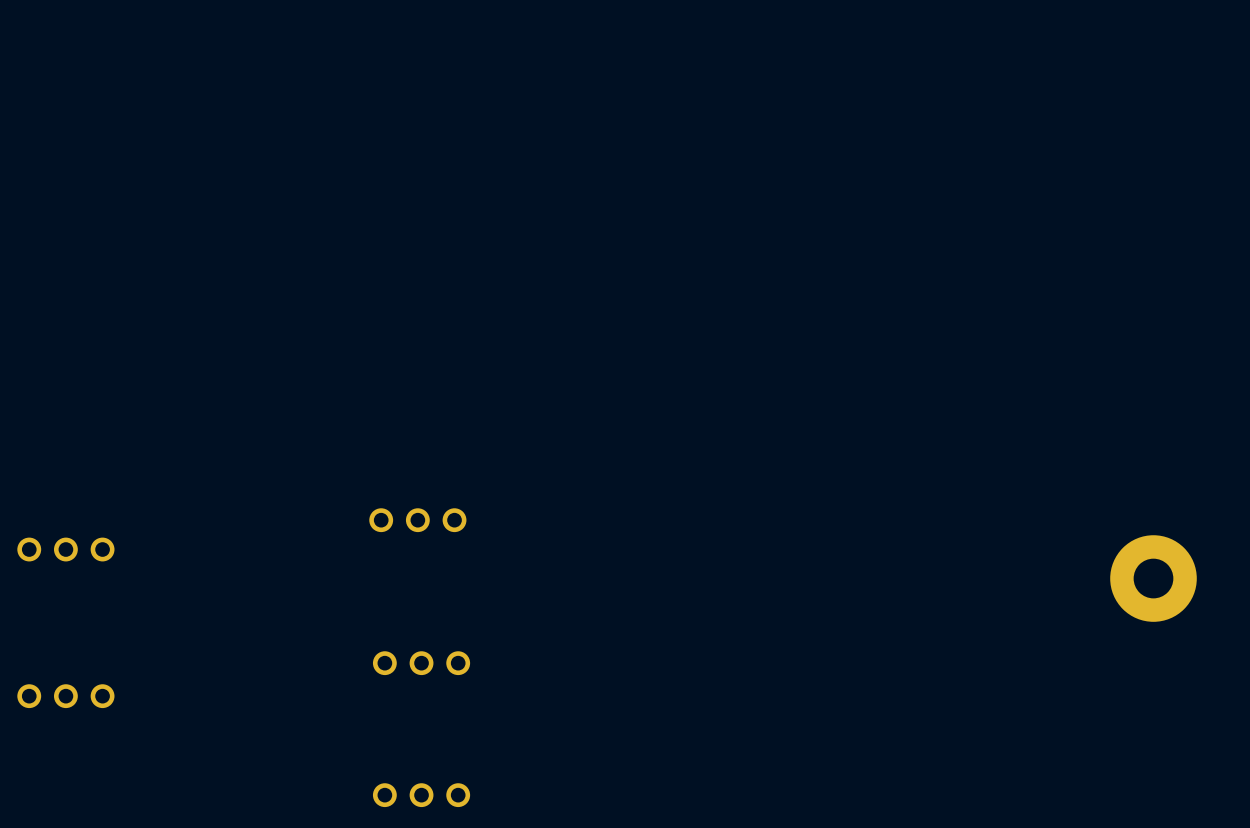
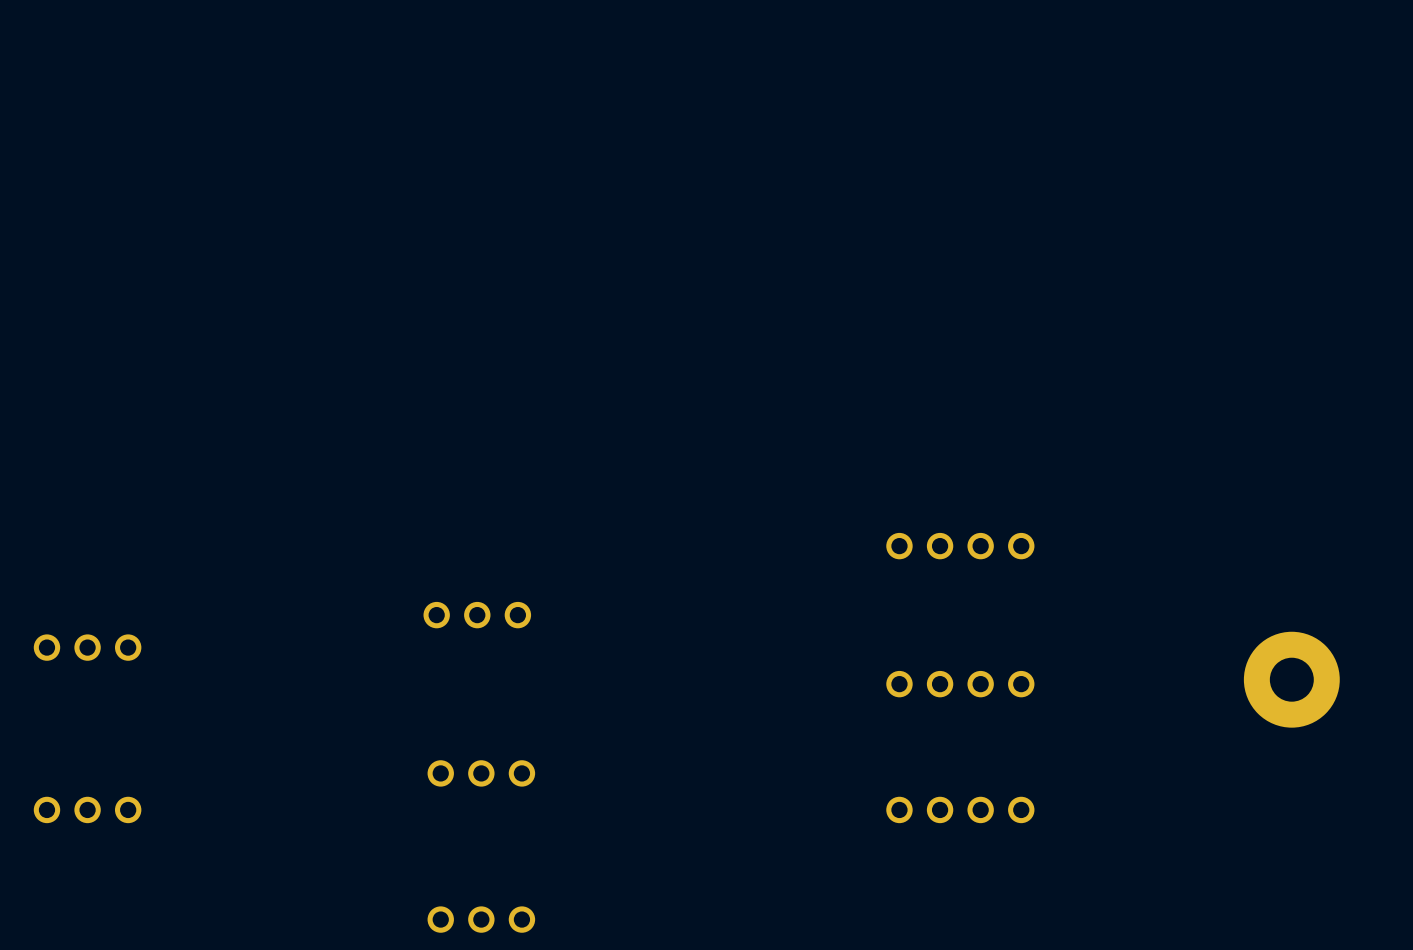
part: none -> (960, 546)
part: none -> (960, 684)
part: none -> (960, 809)

